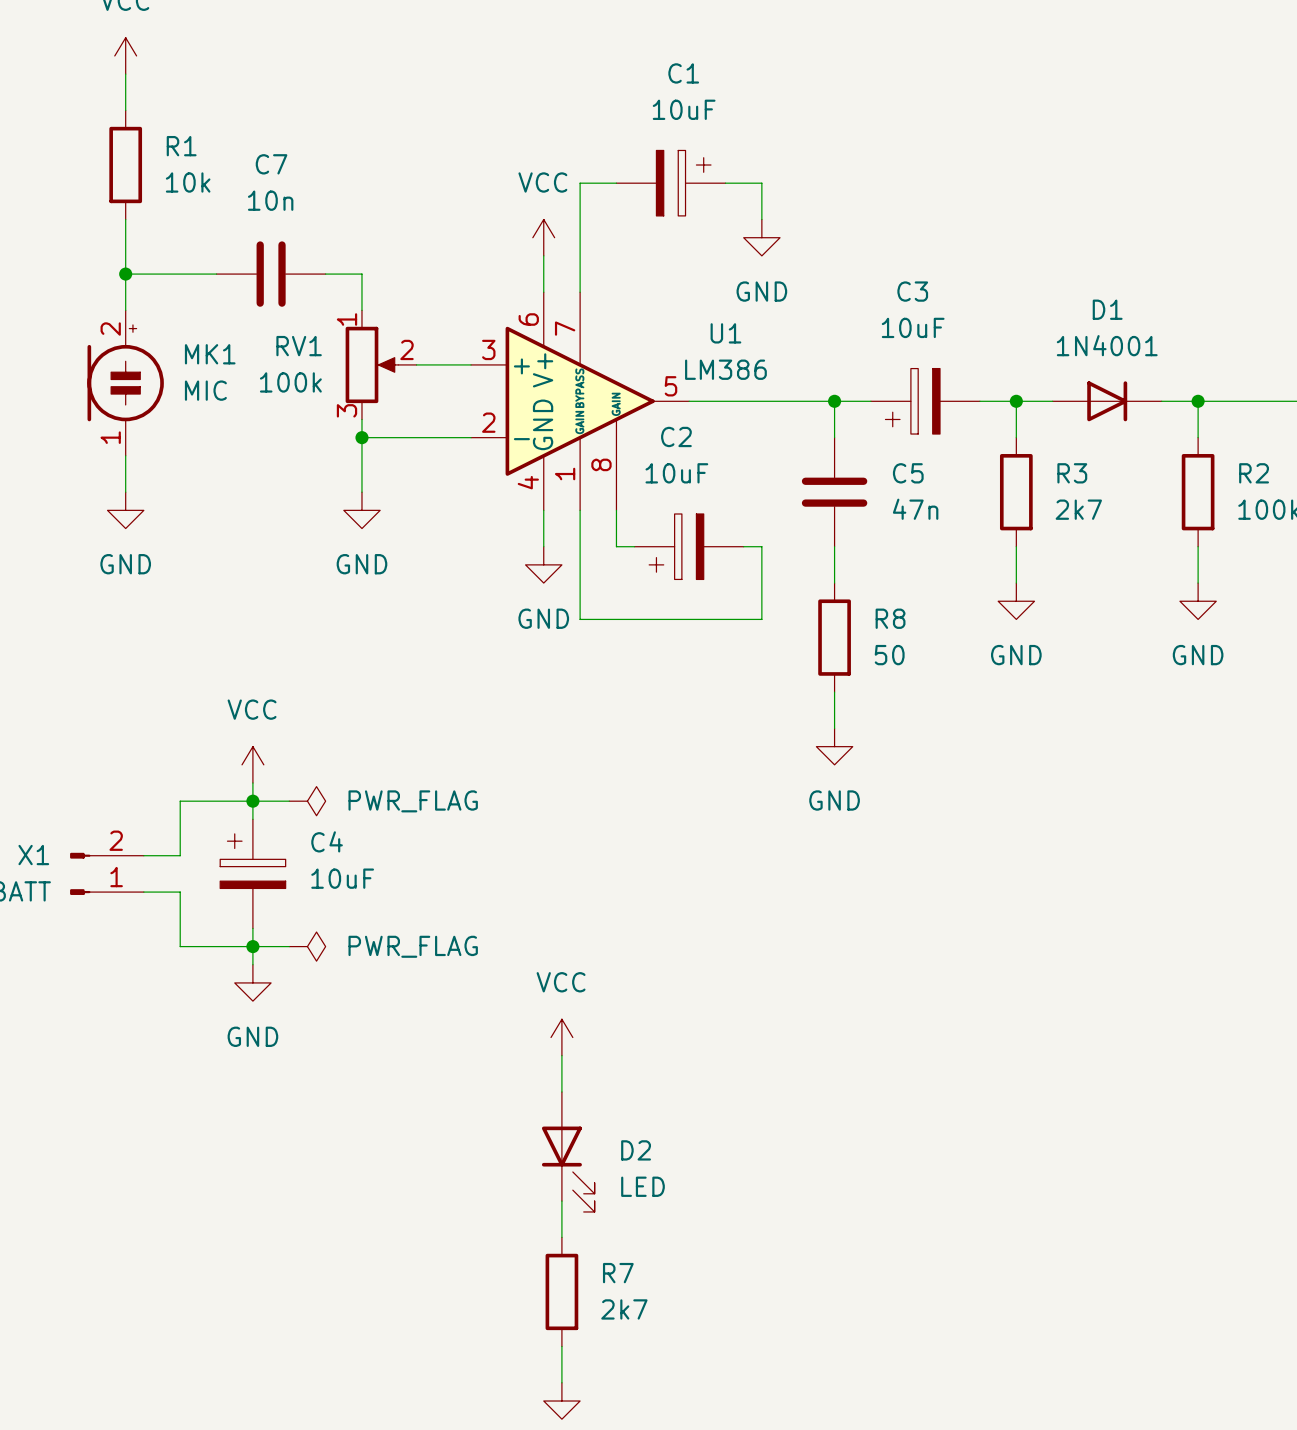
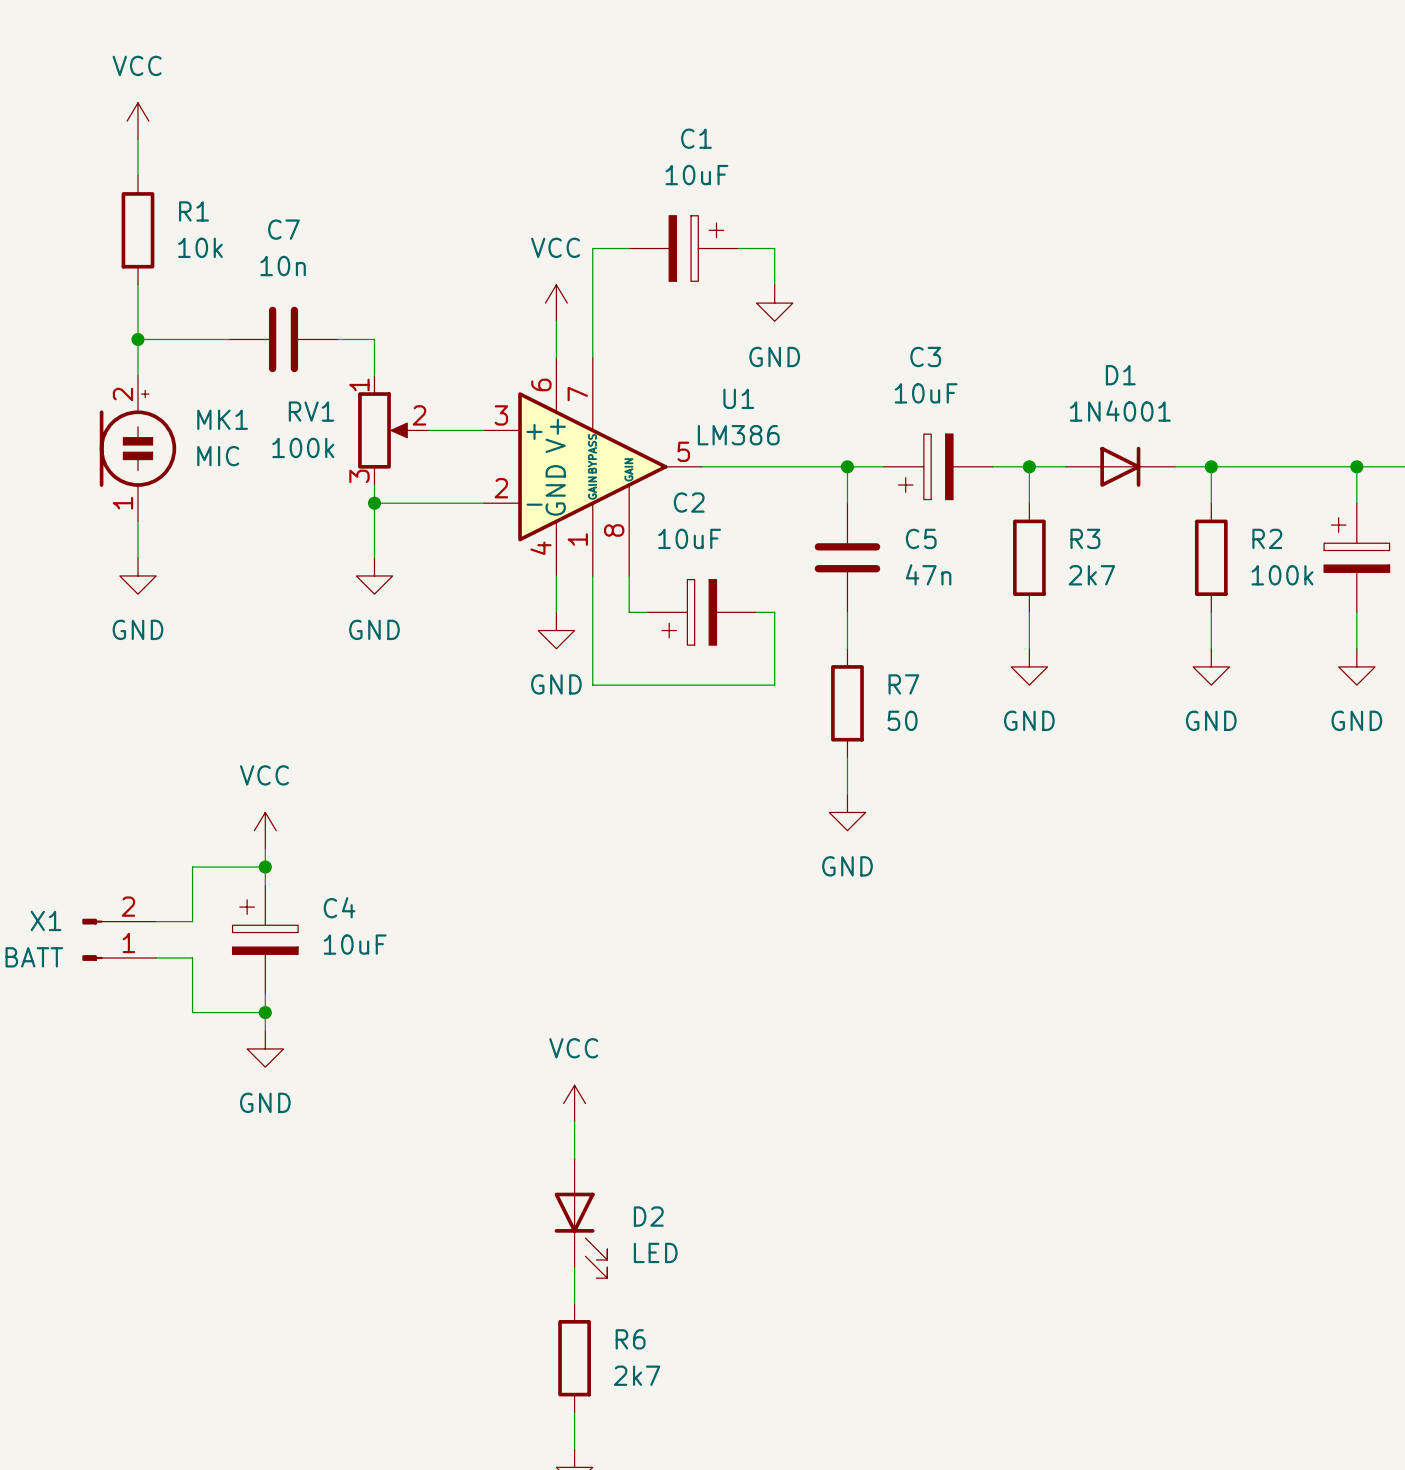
R8 name: R8 (890, 618) -> R7 (903, 684)
wire: (252, 801) (289, 801) -> none
power symbol: PWR_FLAG (307, 801) -> none
wire: (252, 946) (289, 946) -> none
power symbol: PWR_FLAG (307, 946) -> none
R7 name: R7 (618, 1273) -> R6 (630, 1339)

